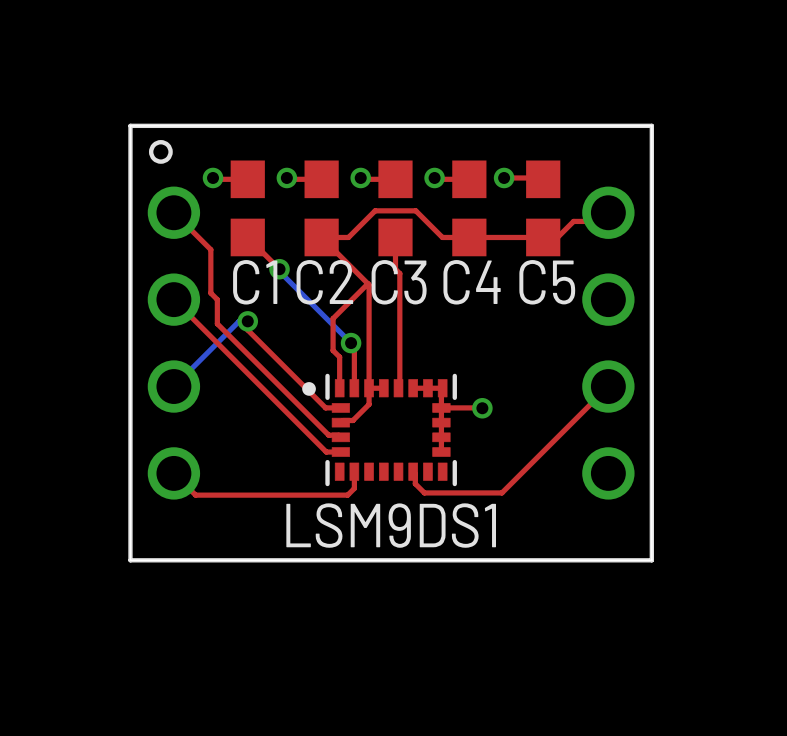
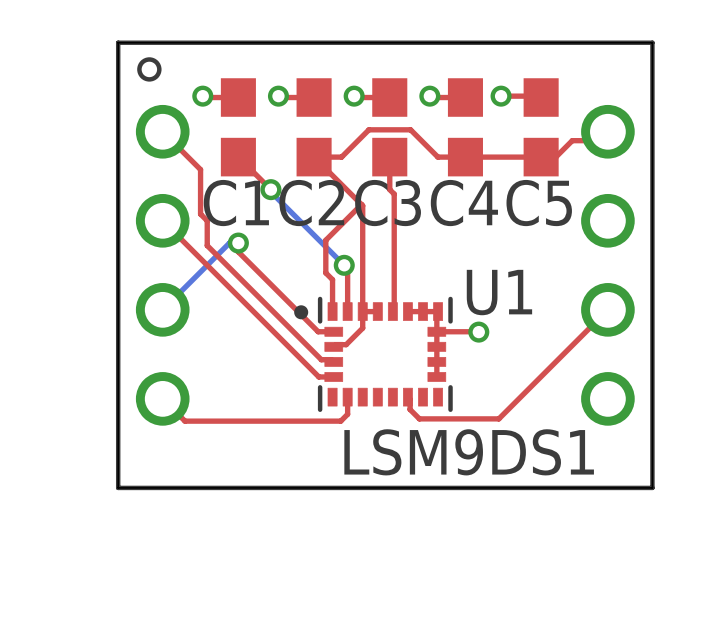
U1 name: none -> U1 (499, 292)
text position: LSM9DS1 (391, 525) -> LSM9DS1 (469, 452)

